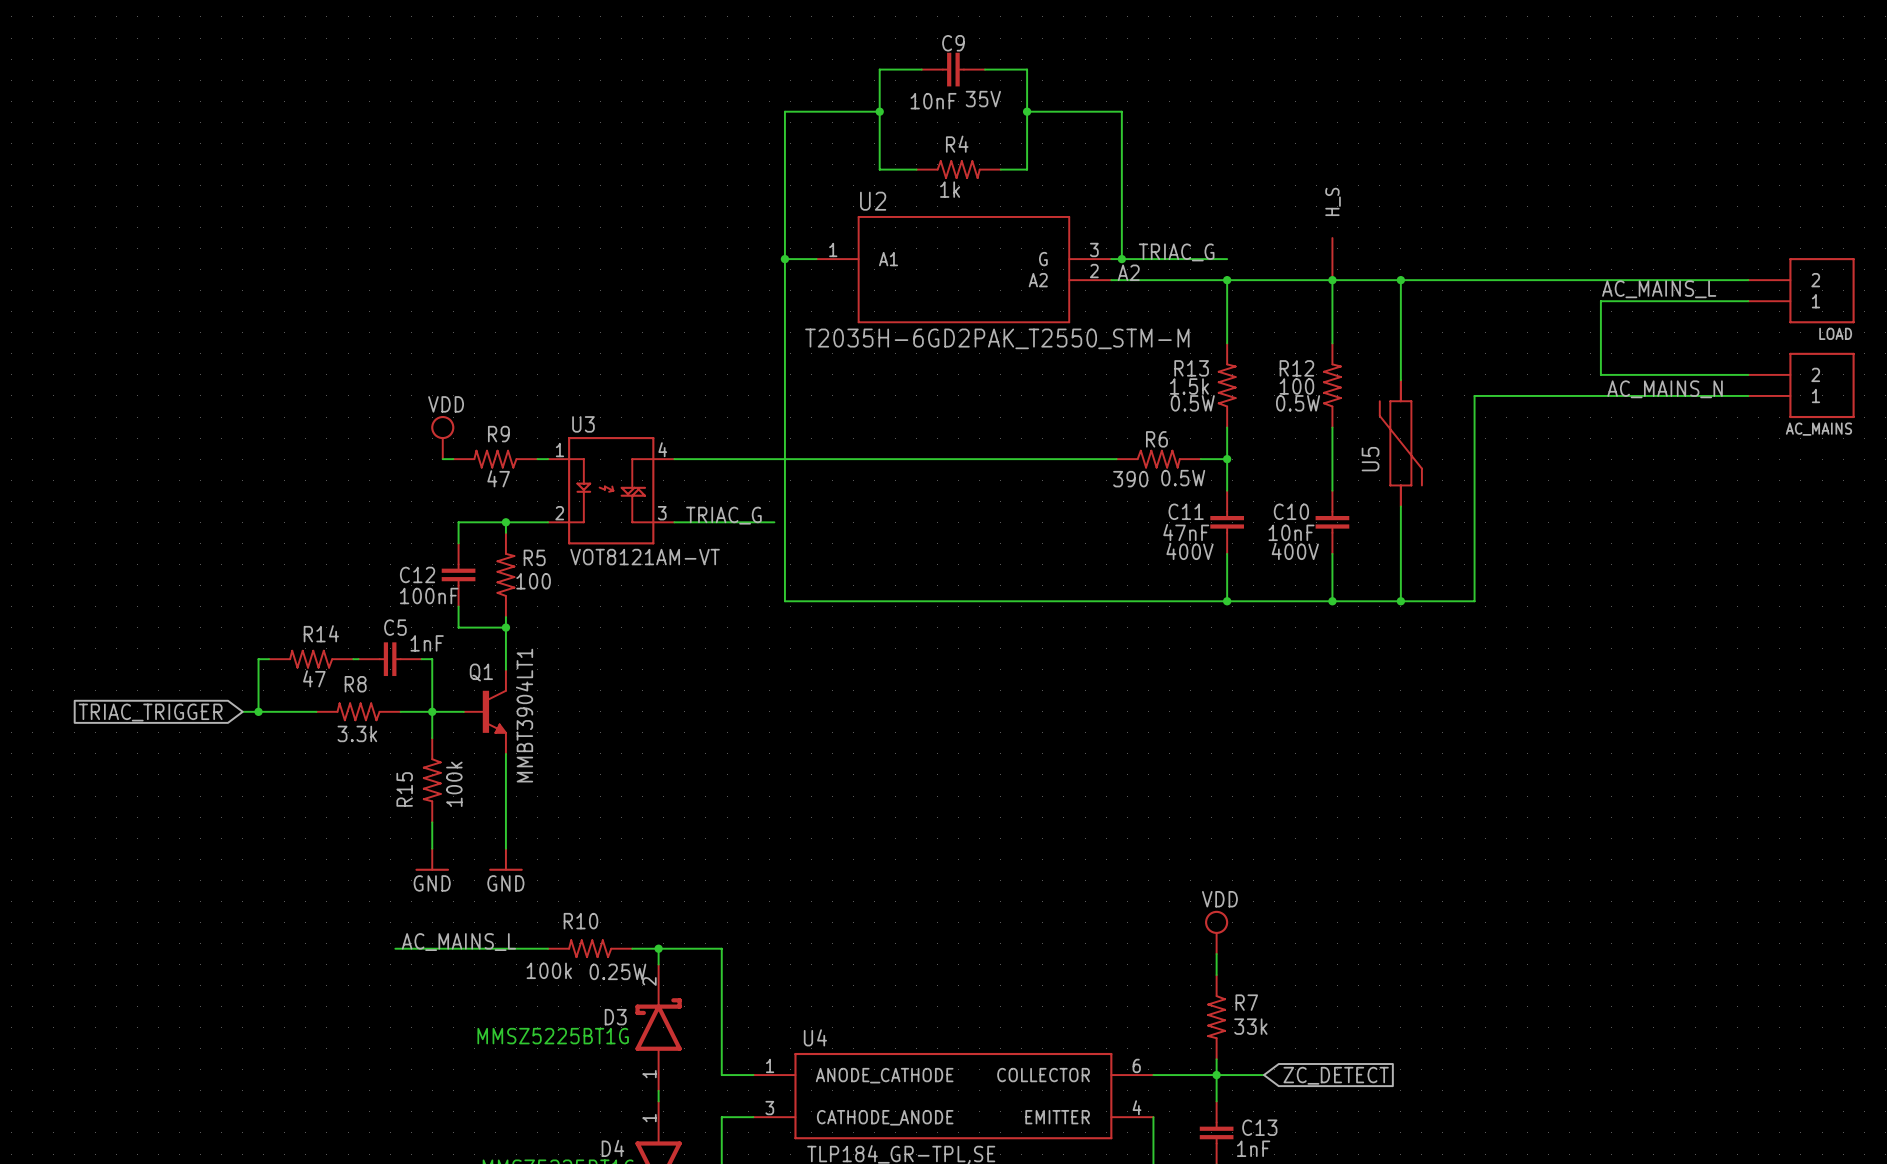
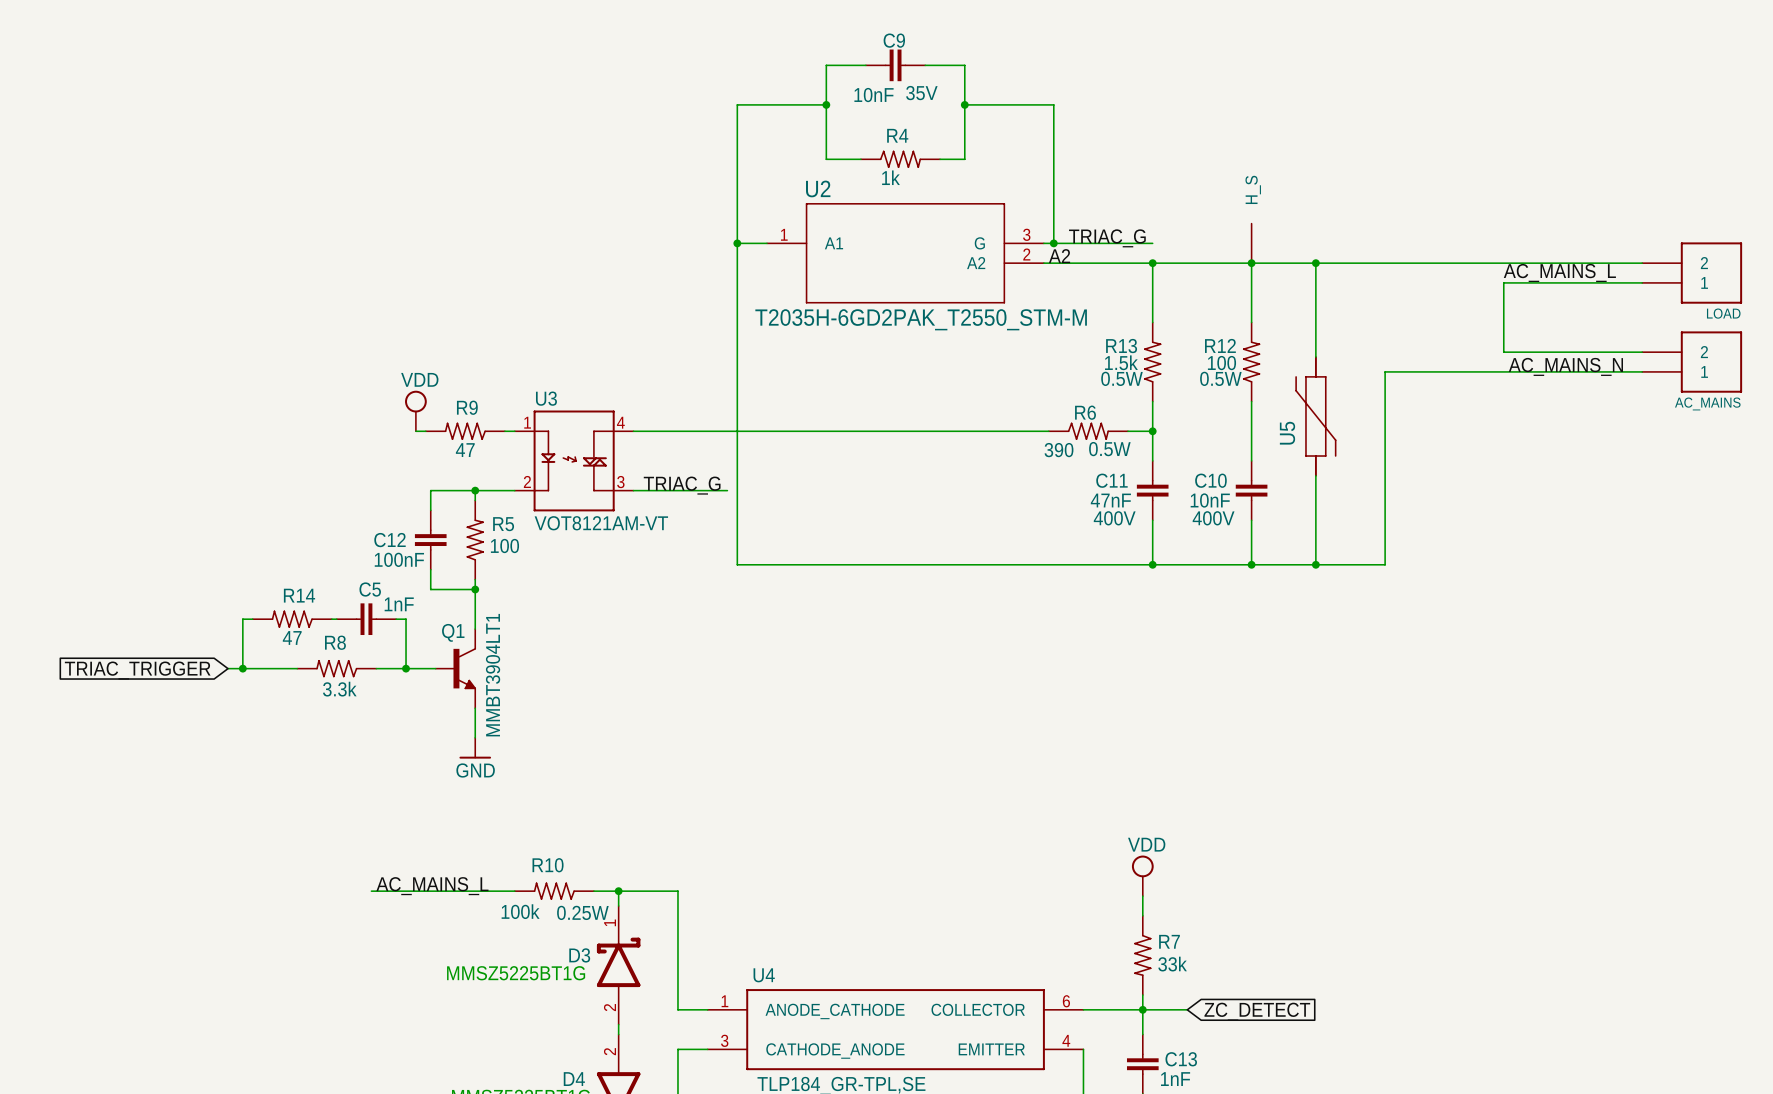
wire: (432, 711) (432, 738) -> none
R15: 100k (432, 780) -> none
wire: (505, 785) (505, 848) -> none
power symbol: none -> GND (475, 748)
wire: (432, 822) (432, 848) -> none
power symbol: GND (432, 859) -> none
power symbol: GND (505, 859) -> none
D3 pin number: 2 (649, 981) -> 1 (610, 922)
D3 pin number: 1 (649, 1074) -> 2 (609, 1007)
D4 pin number: 1 (649, 1118) -> 2 (609, 1051)

